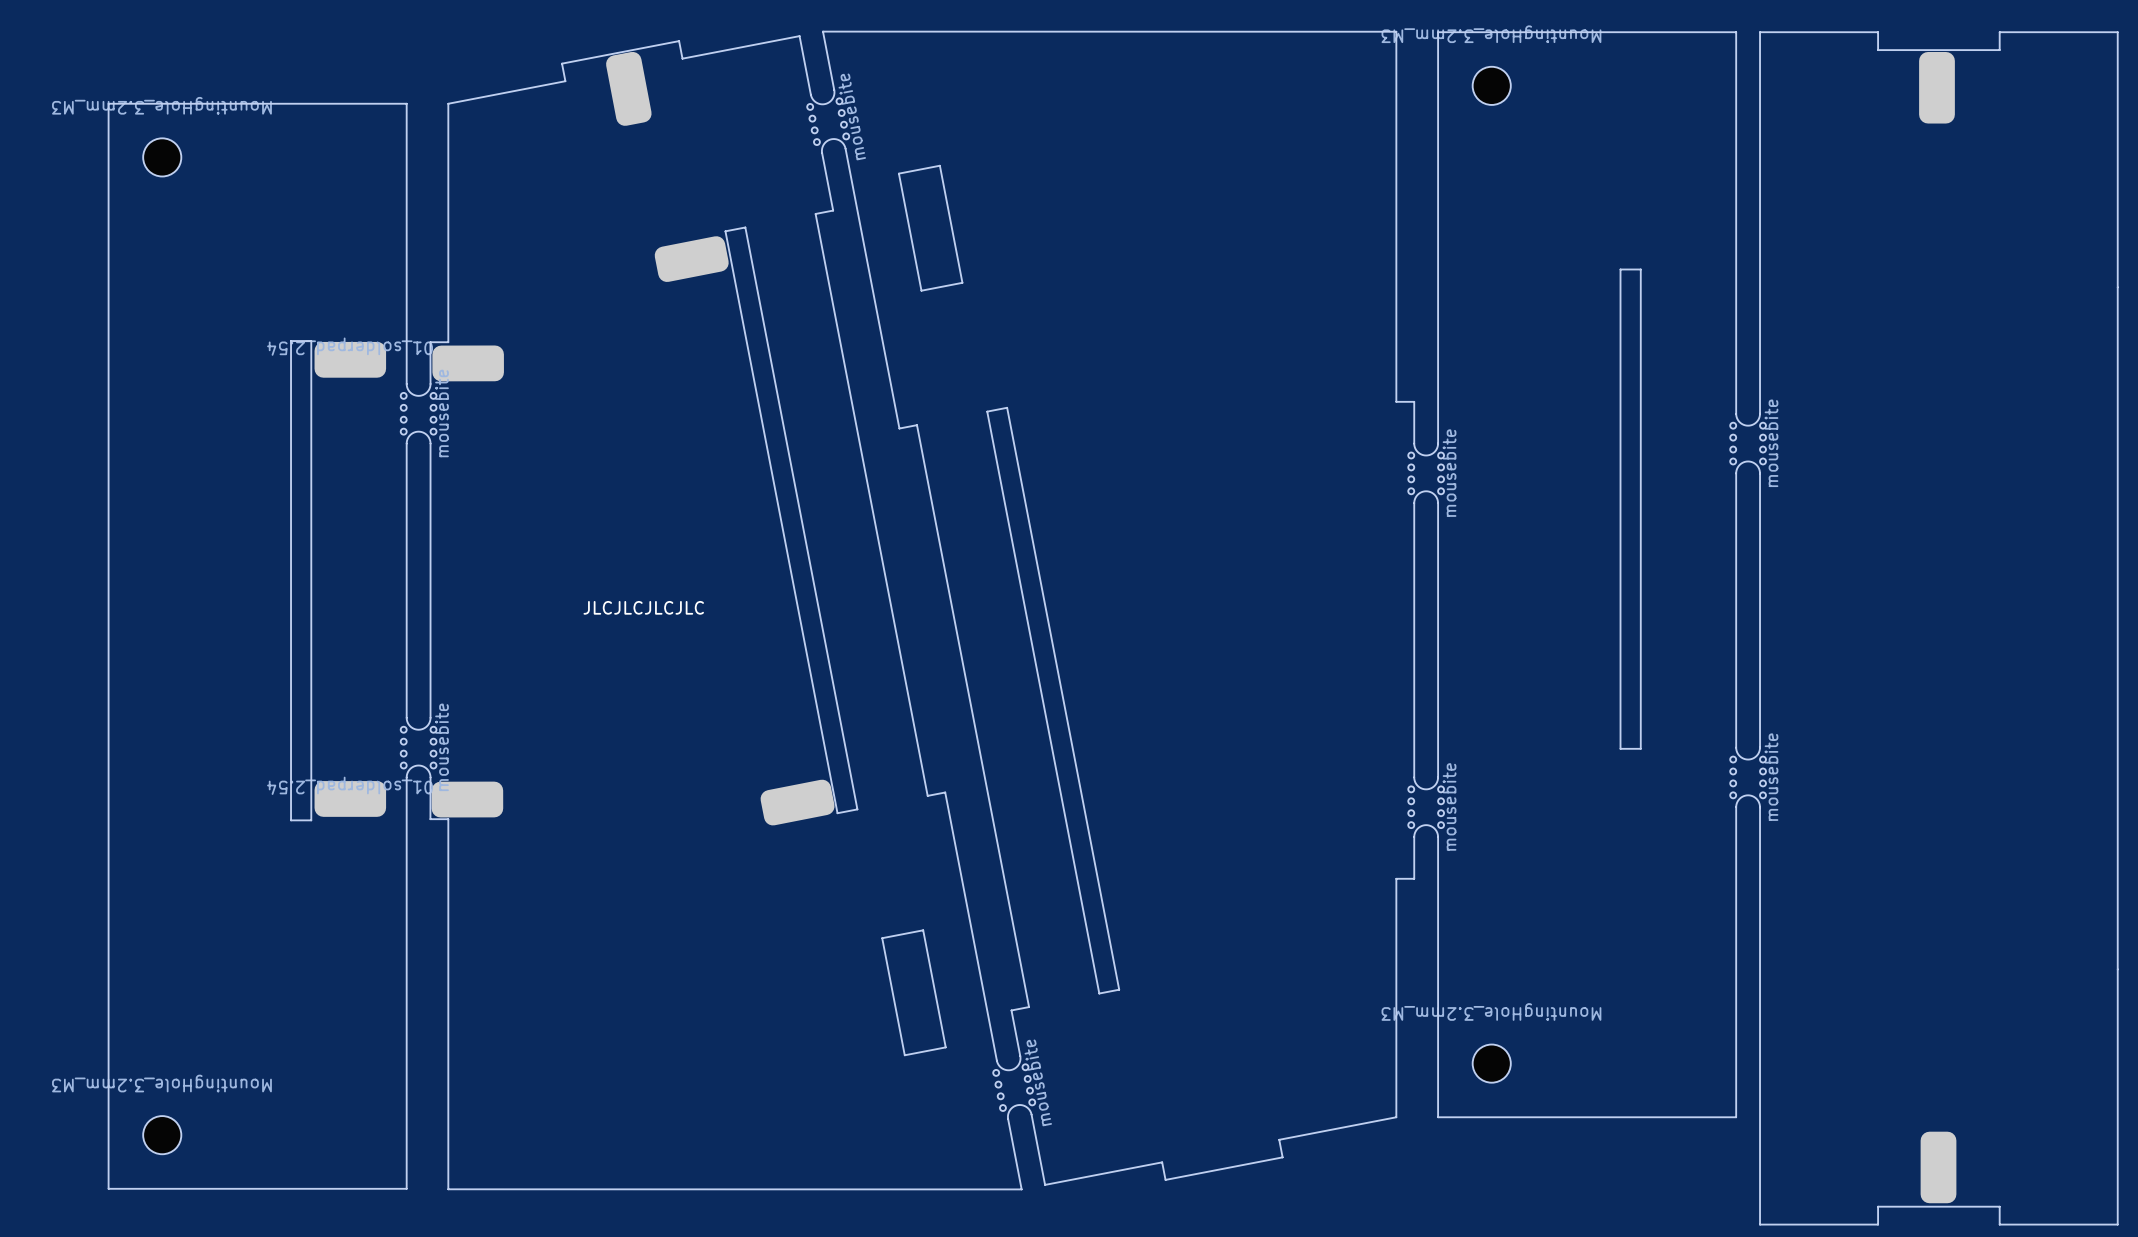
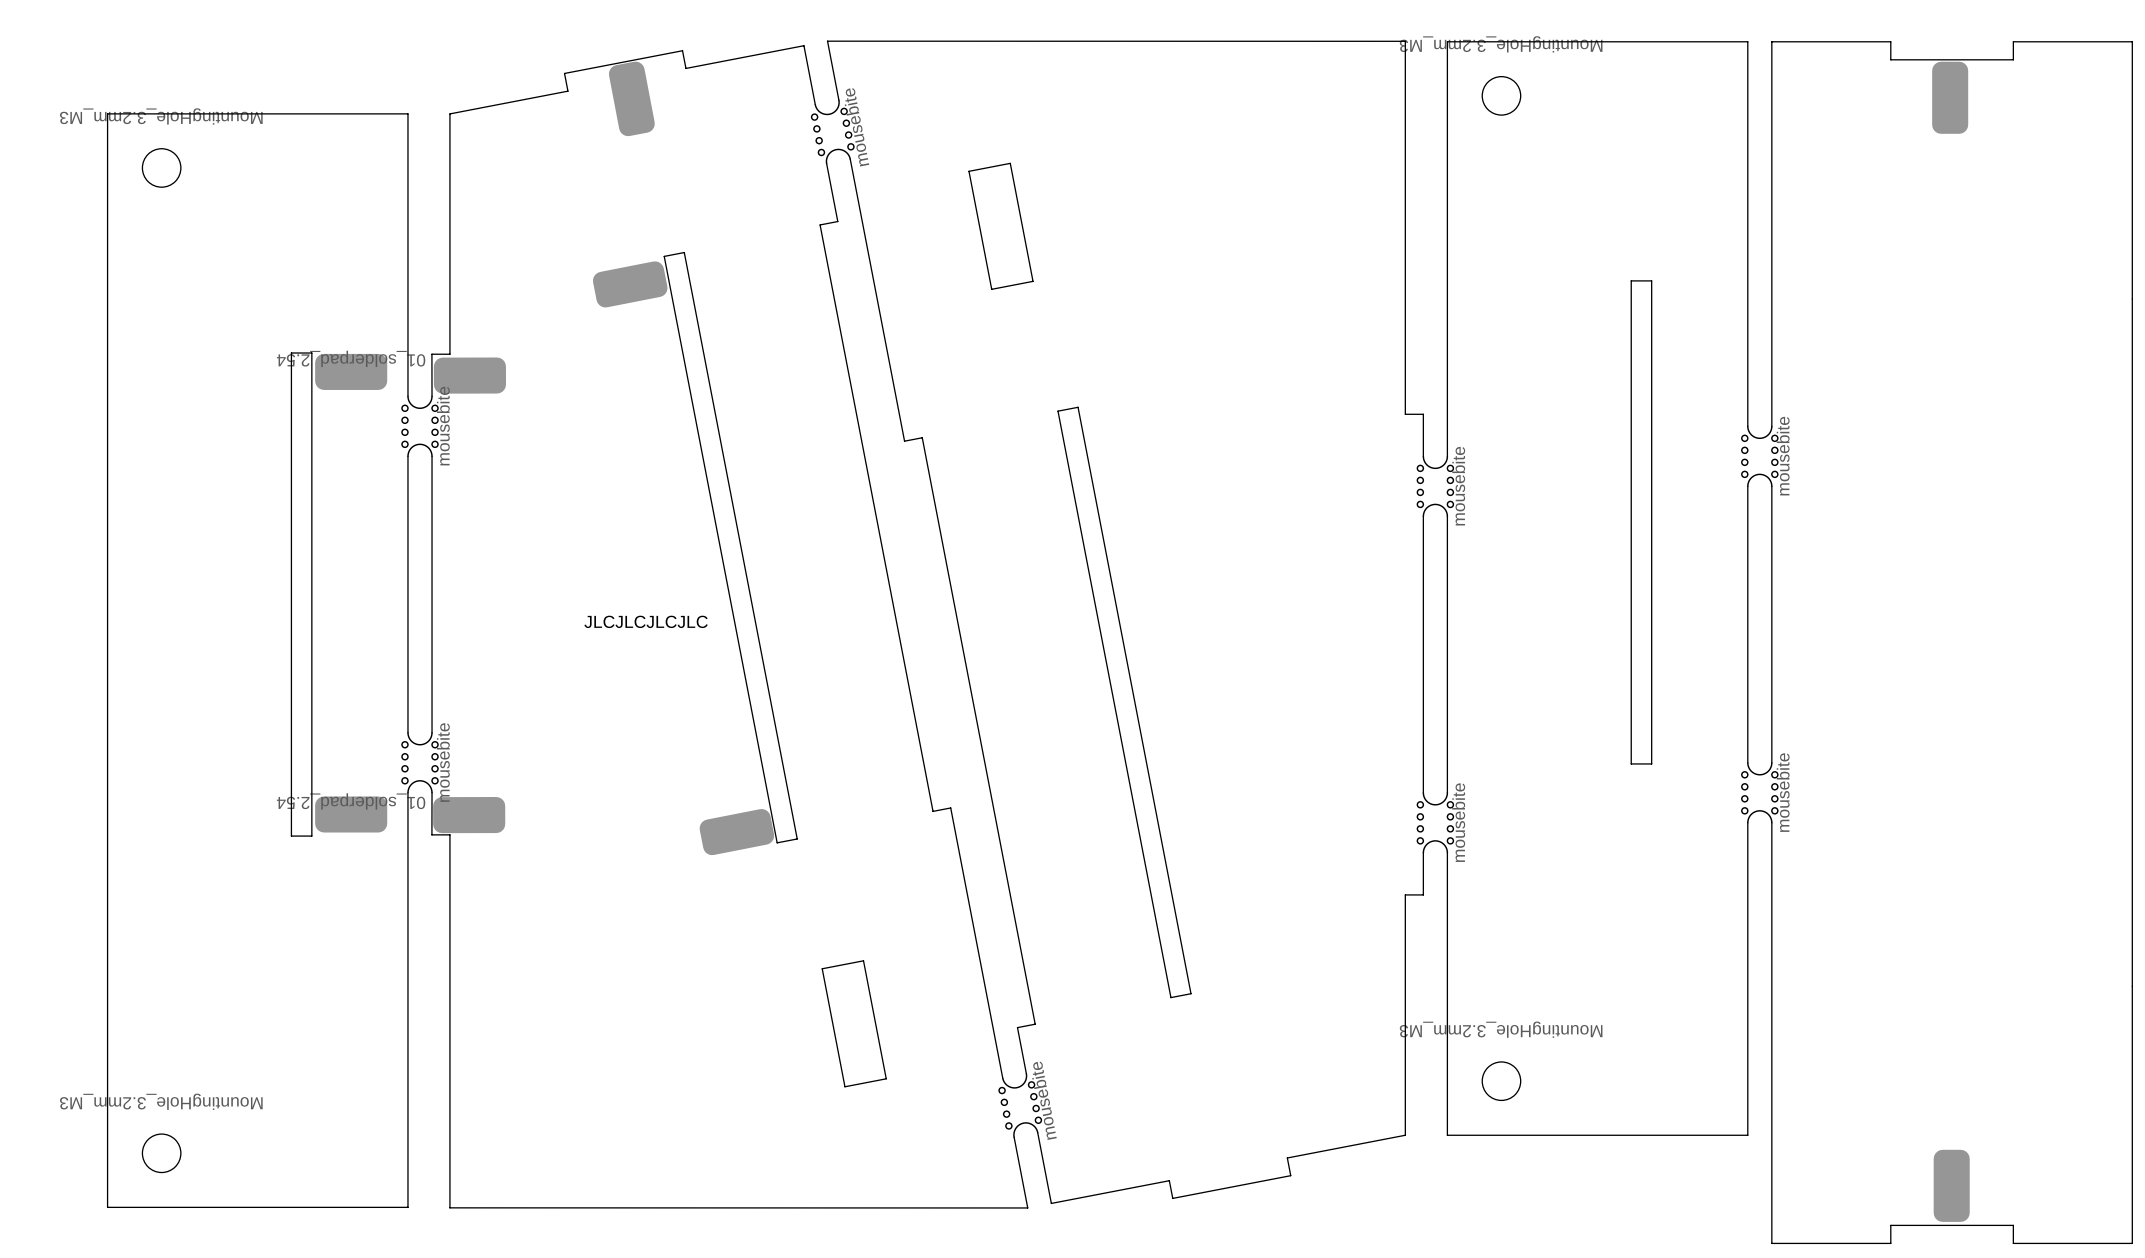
board edge: (939, 165) (898, 173) (921, 290) (962, 282) (939, 165) -> (1010, 163) (968, 171) (991, 289) (1033, 281) (1010, 163)
board edge: (745, 227) (725, 231) (837, 813) (857, 809) (745, 227) -> (684, 252) (664, 256) (777, 842) (797, 838) (684, 252)
part position: (691, 259) -> (630, 284)
board edge: (1007, 407) (987, 411) (1099, 993) (1119, 989) (1007, 407) -> (1078, 407) (1058, 411) (1170, 997) (1190, 993) (1078, 407)
part position: (797, 802) -> (736, 832)
board edge: (923, 930) (882, 938) (904, 1055) (945, 1047) (923, 930) -> (863, 960) (822, 968) (844, 1086) (886, 1078) (863, 960)

